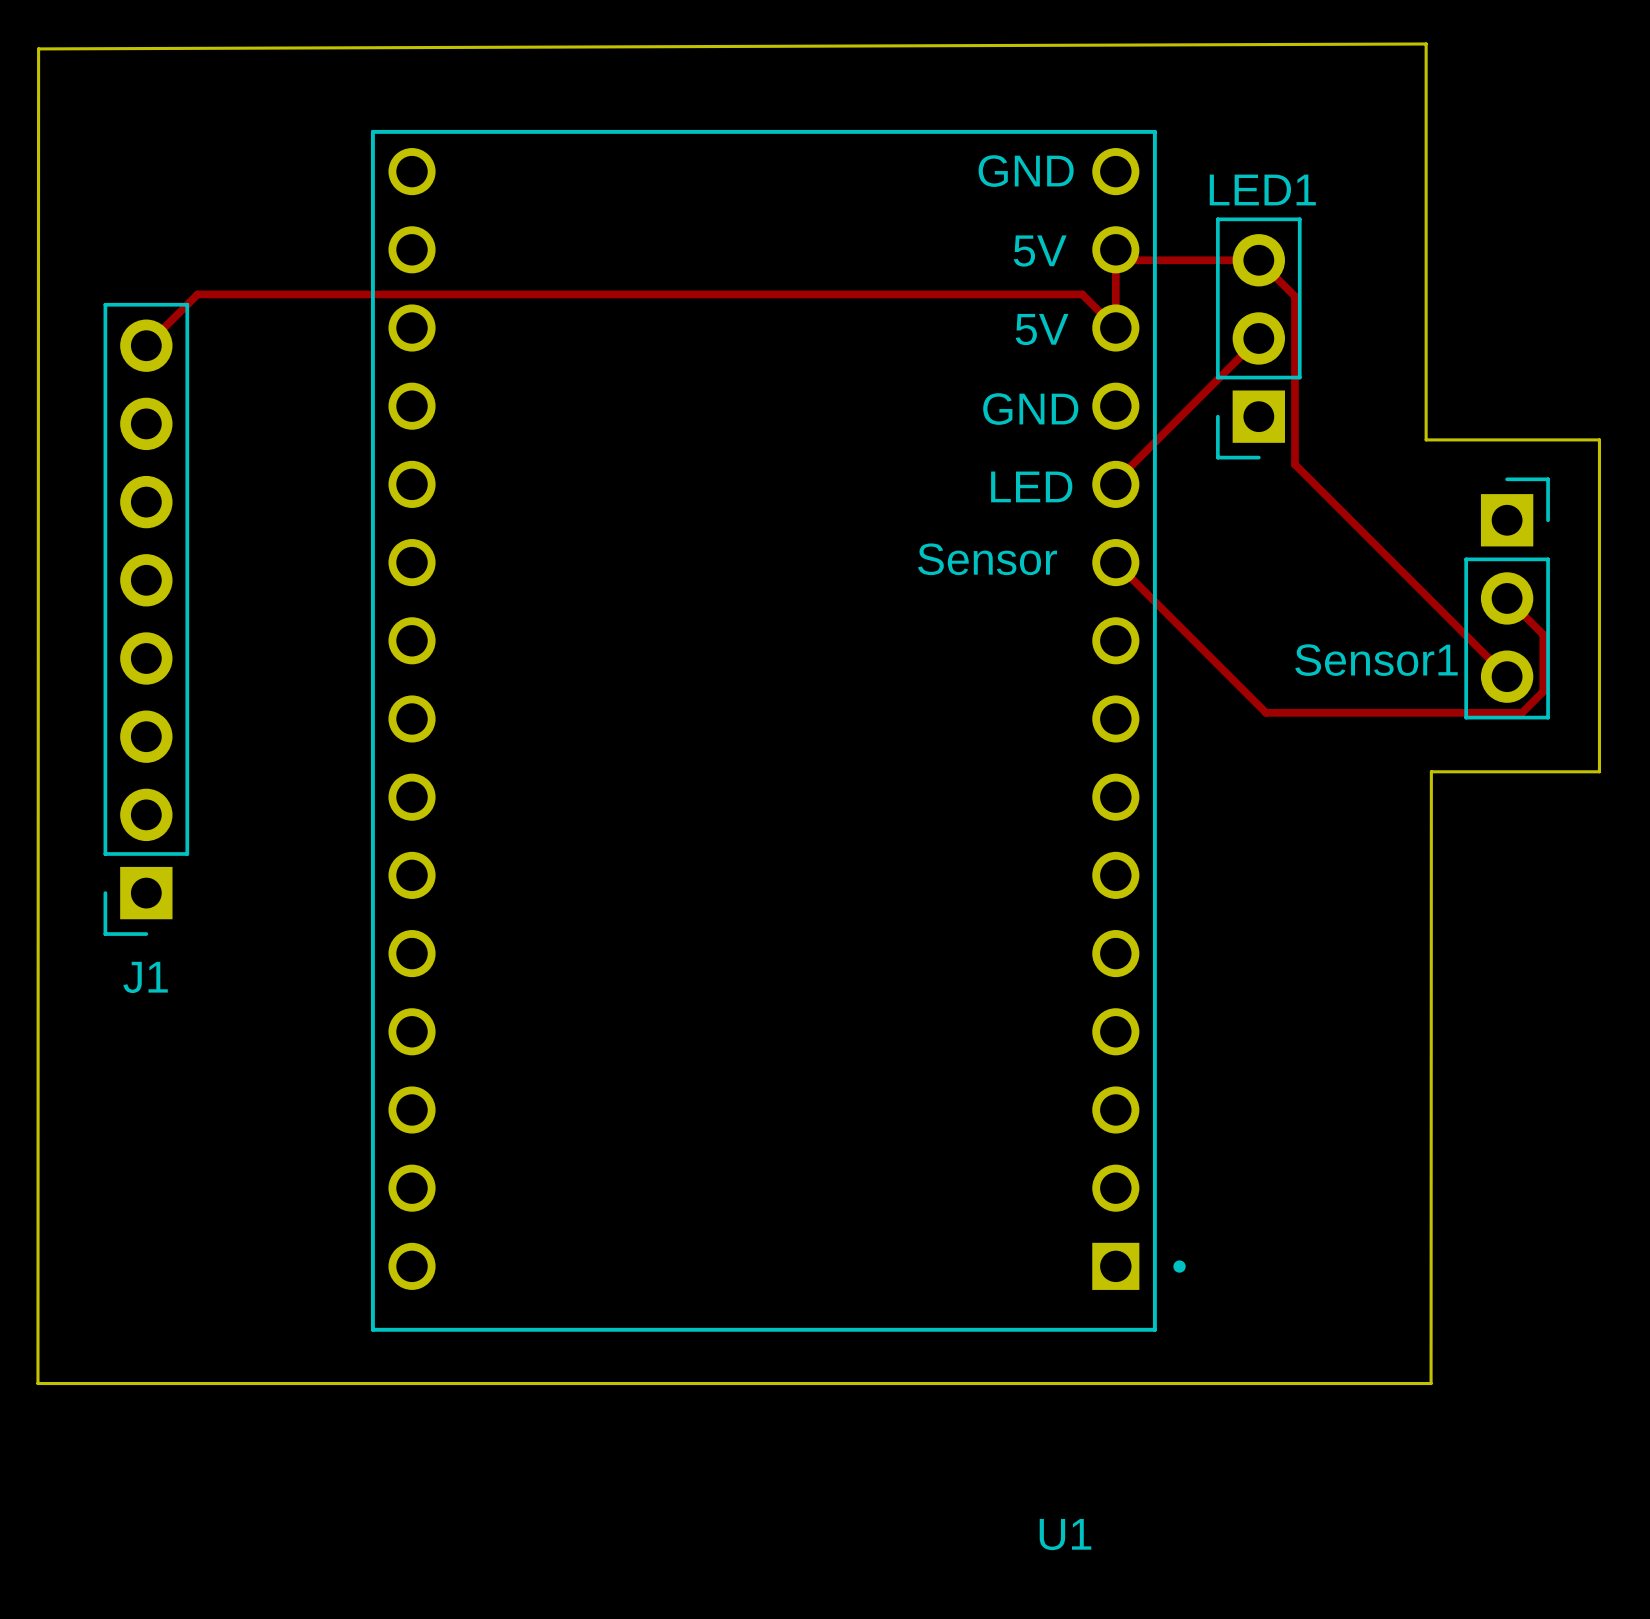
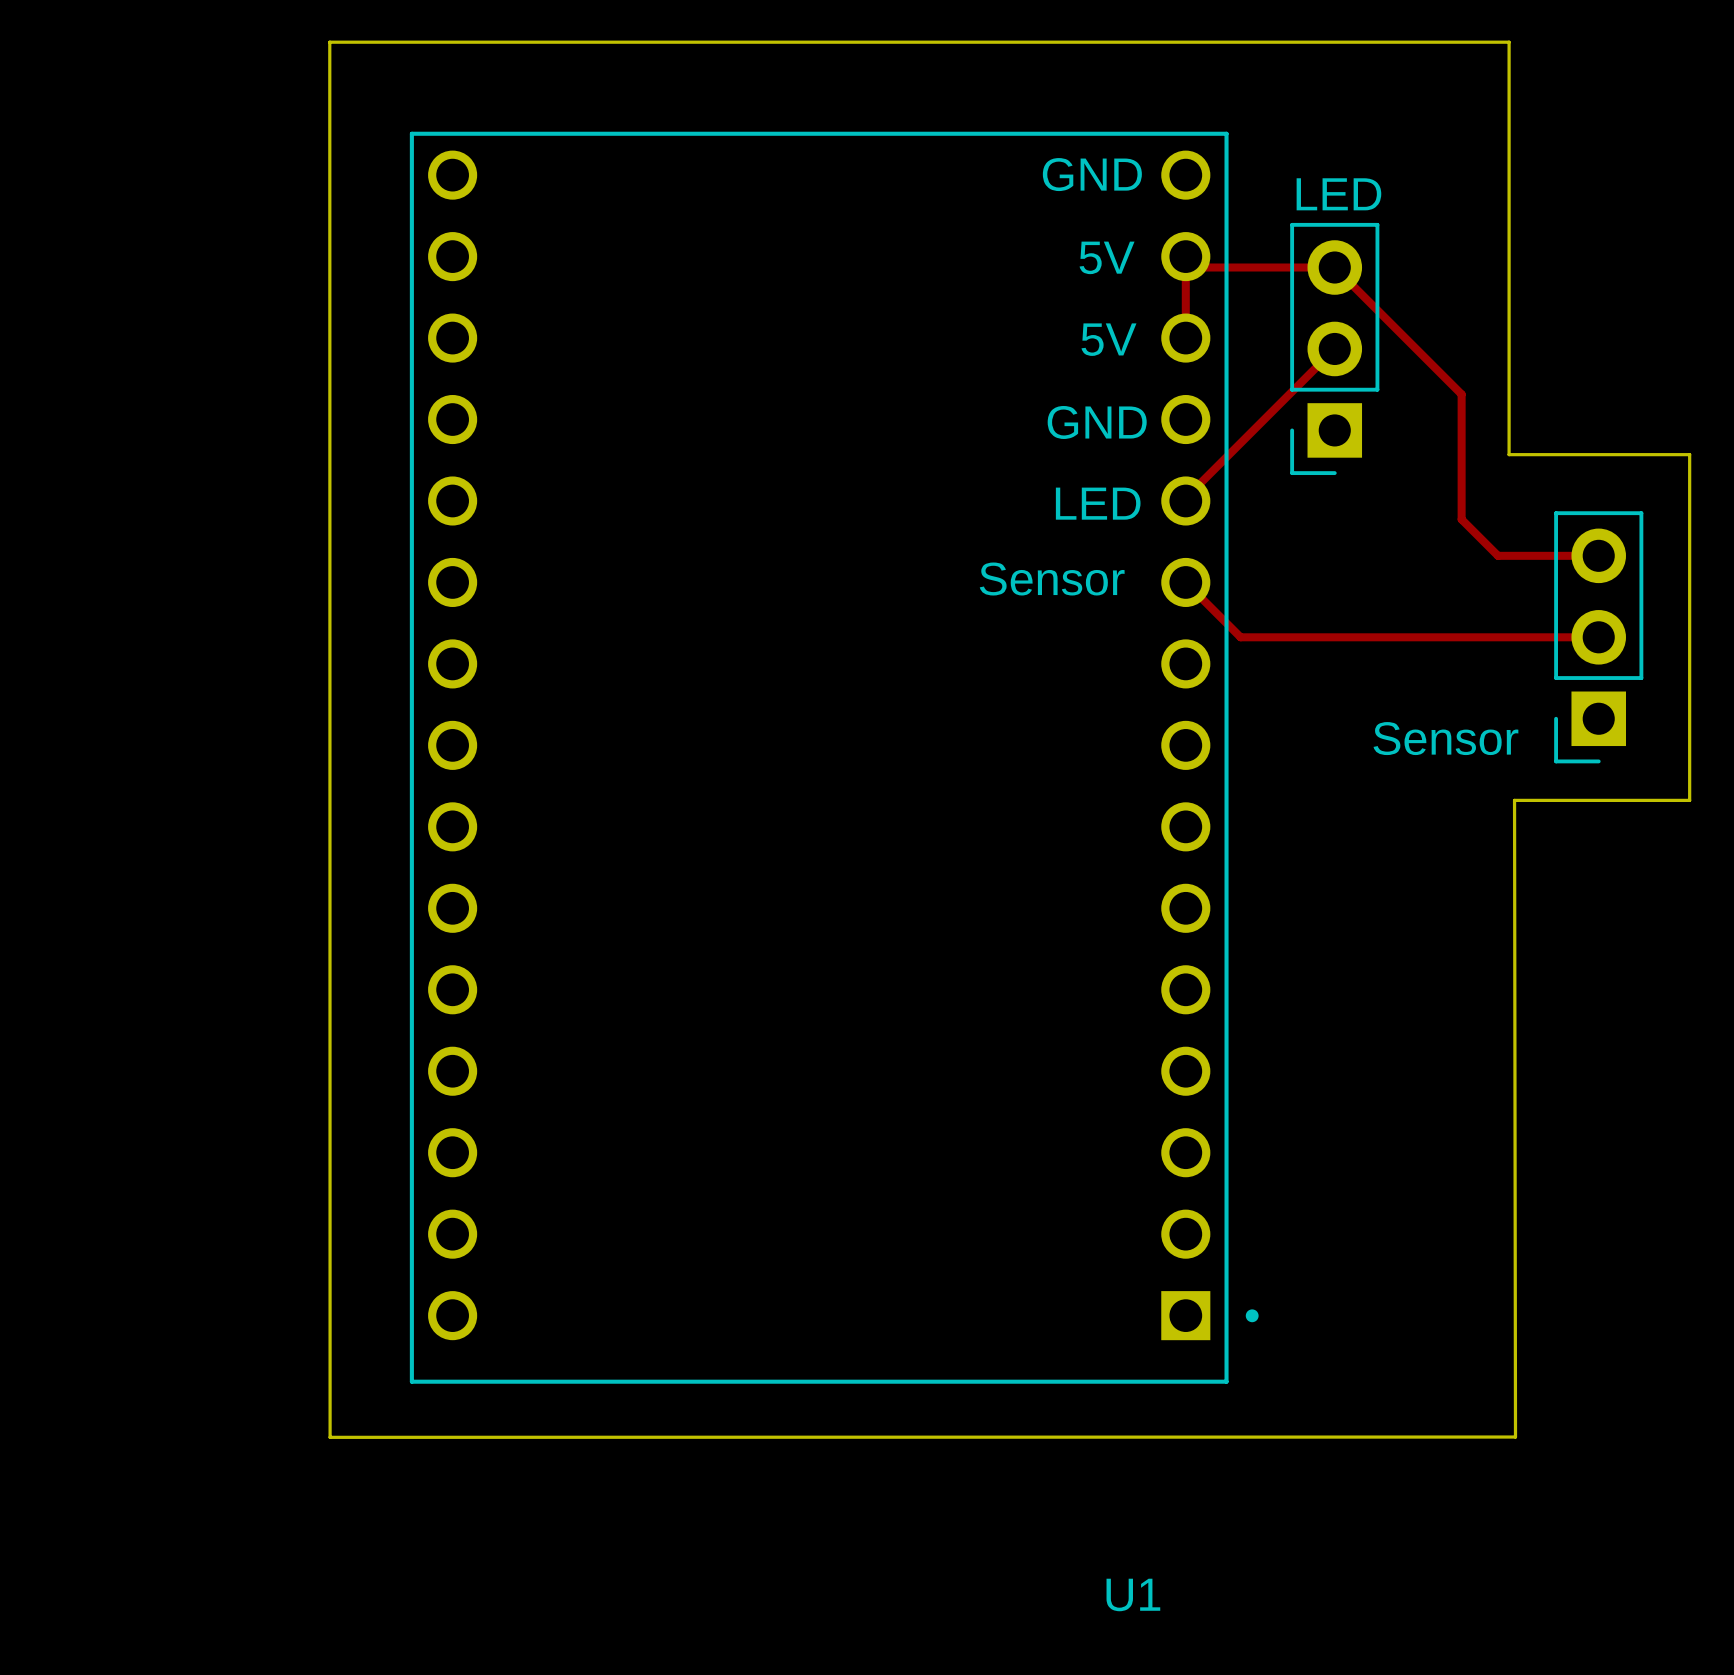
board edge: (1426, 43) (38, 48) (37, 1383) (1431, 1383) (1431, 771) -> (1509, 42) (329, 42) (330, 1437) (1515, 1437) (1514, 800)
LED1 name: LED1 (1262, 190) -> LED (1338, 194)
track: (1294, 296) (1294, 464) (1507, 676) -> (1372, 305) (1461, 394) (1461, 519) (1498, 555) (1598, 555)
track: (1115, 327) (1082, 294) (197, 294) (146, 345) -> none
track: (1507, 598) (1543, 634) (1543, 691) (1522, 712) (1266, 712) (1168, 615) -> (1598, 637) (1240, 637)
Sensor1: (1507, 598) -> none
Sensor: none -> (1598, 637)
J1: (146, 619) -> none

